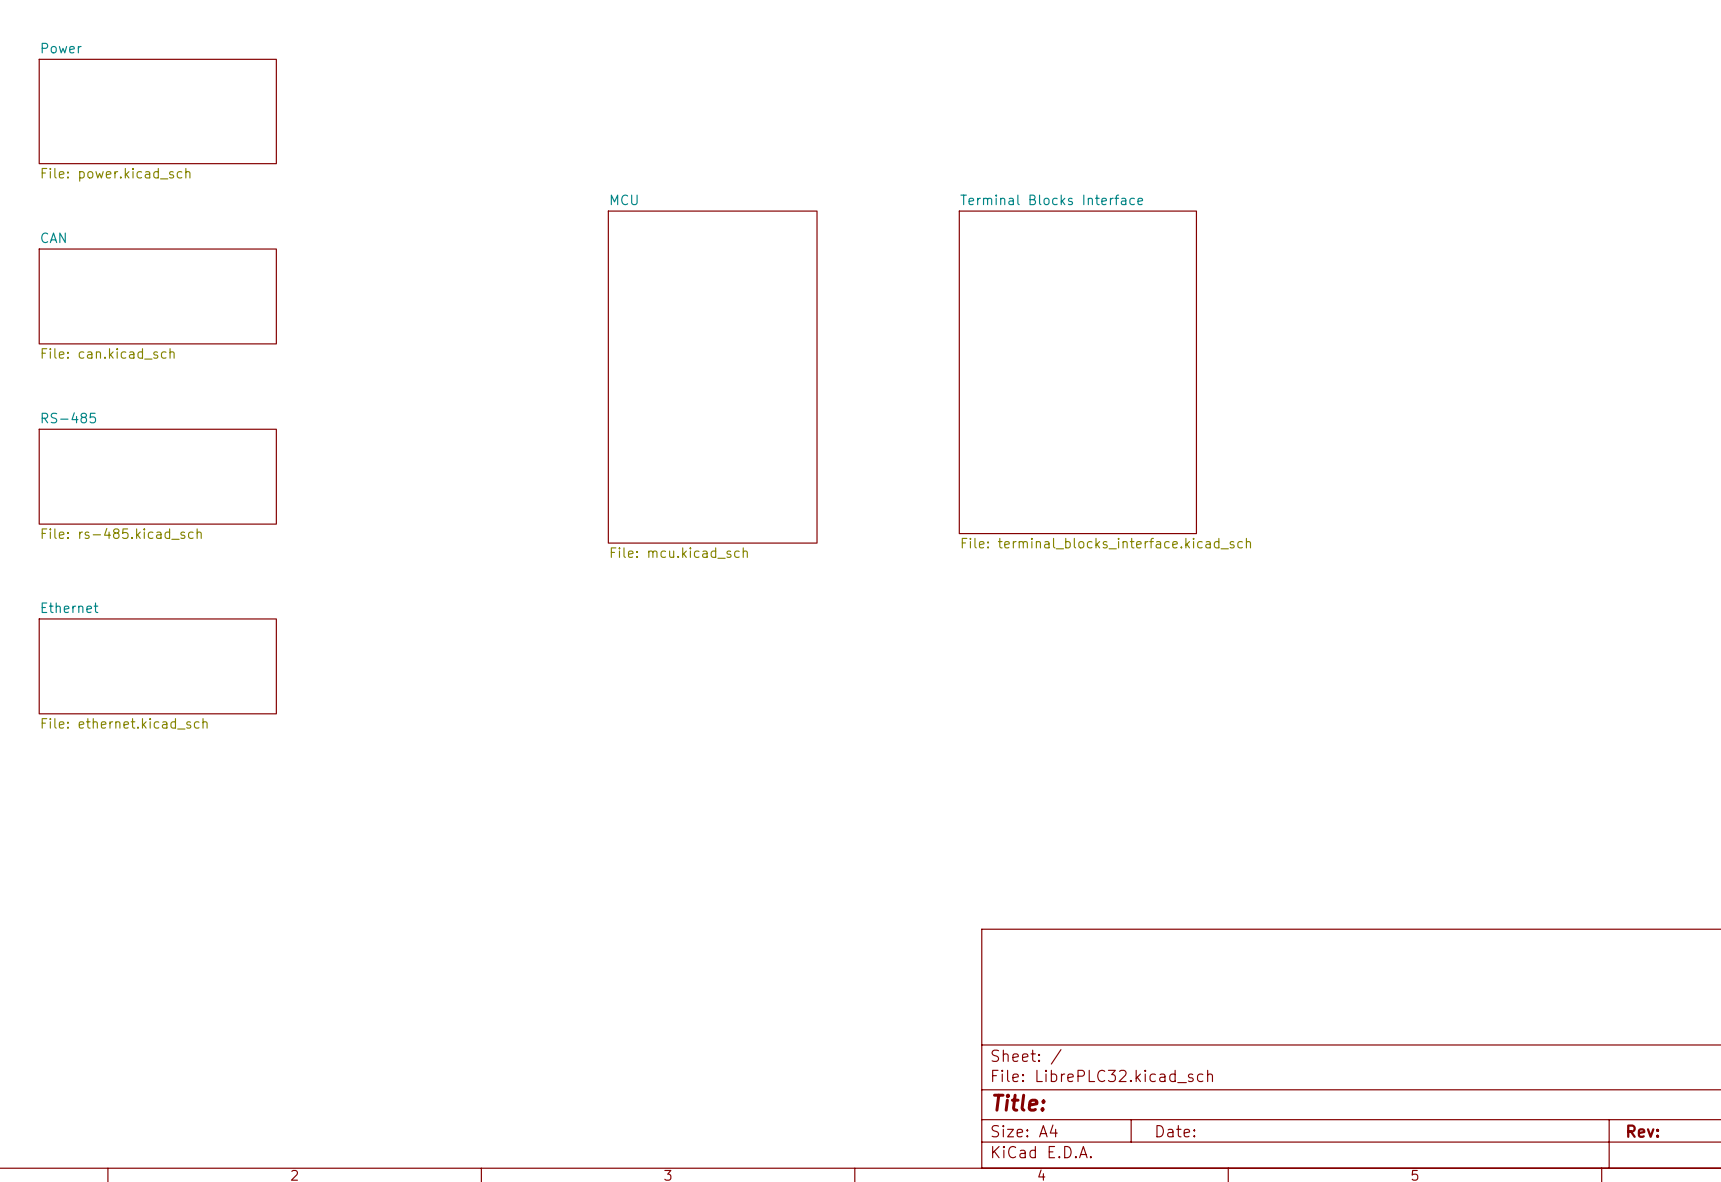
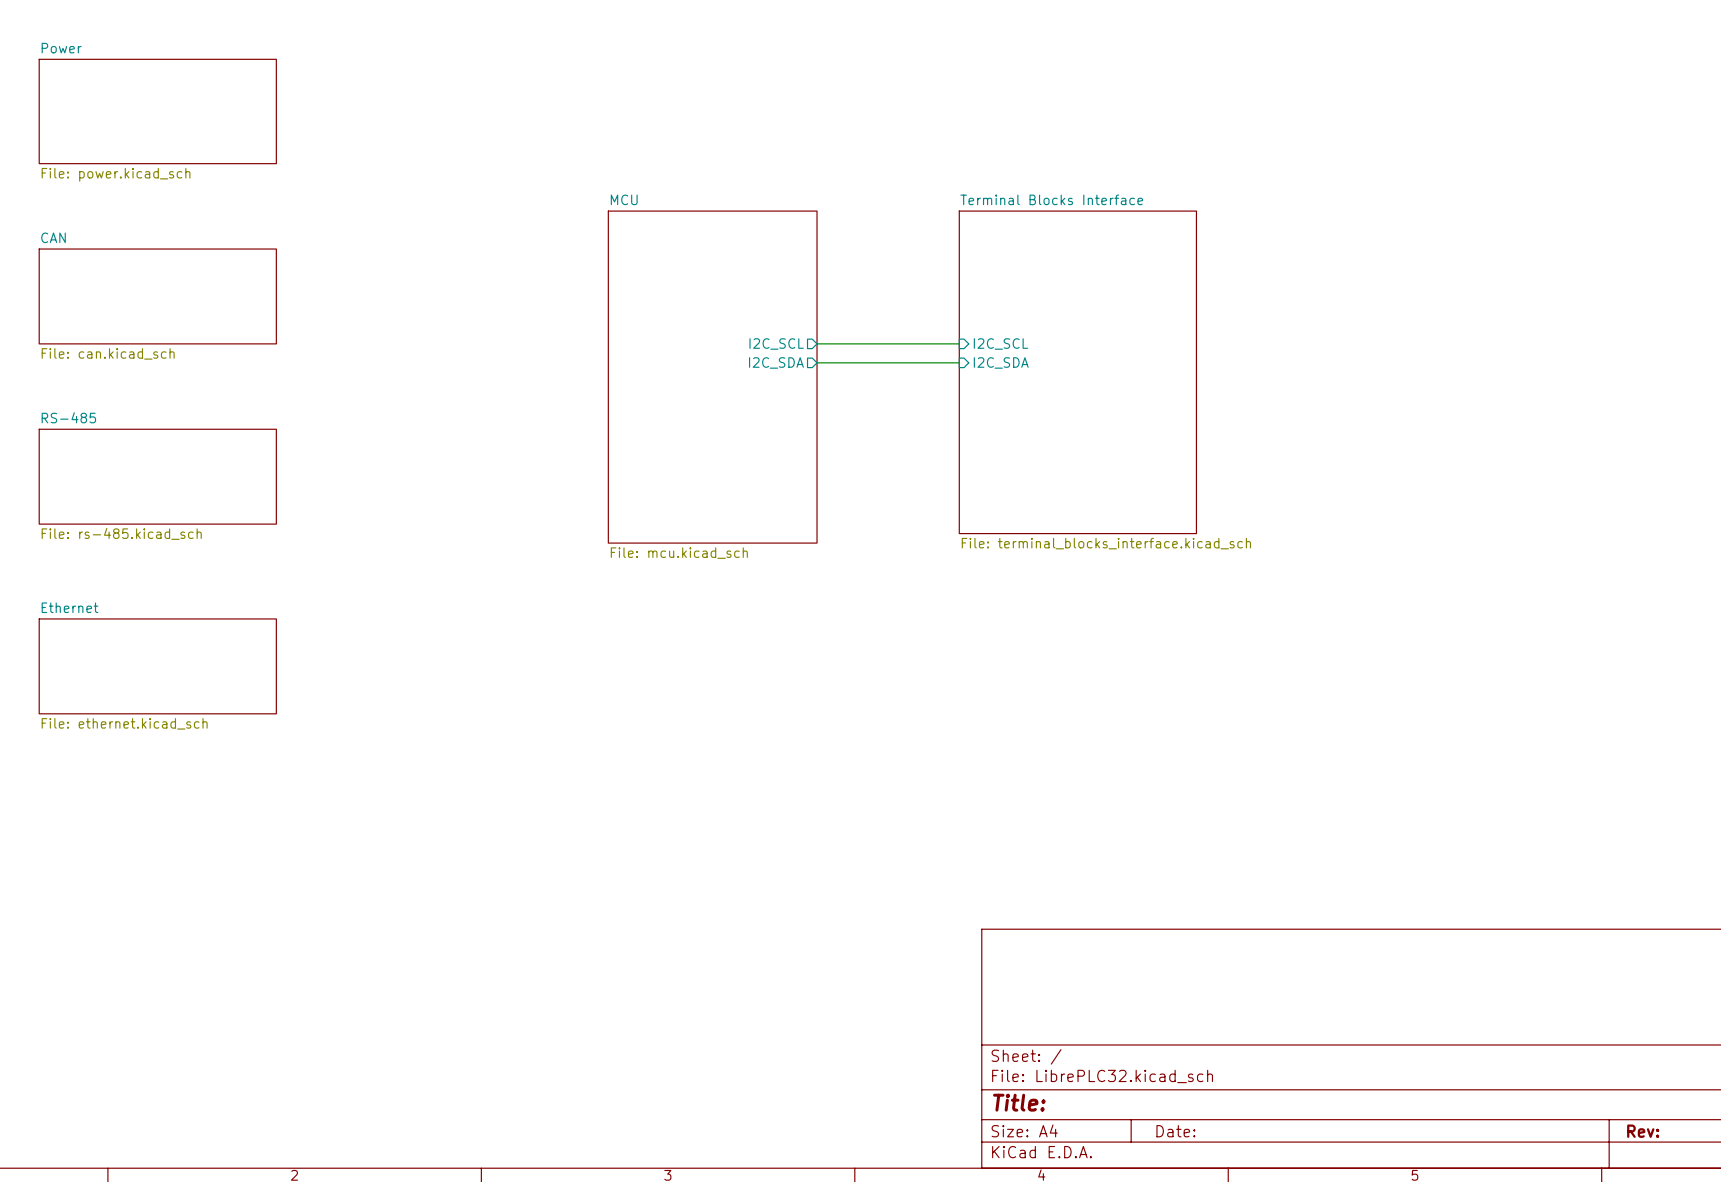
sheet pin: none -> I2C_SCL (776, 343)
wire: none -> (817, 343) (959, 343)
sheet pin: none -> I2C_SCL (1001, 343)
sheet pin: none -> I2C_SDA (776, 362)
wire: none -> (817, 362) (959, 362)
sheet pin: none -> I2C_SDA (1001, 362)

